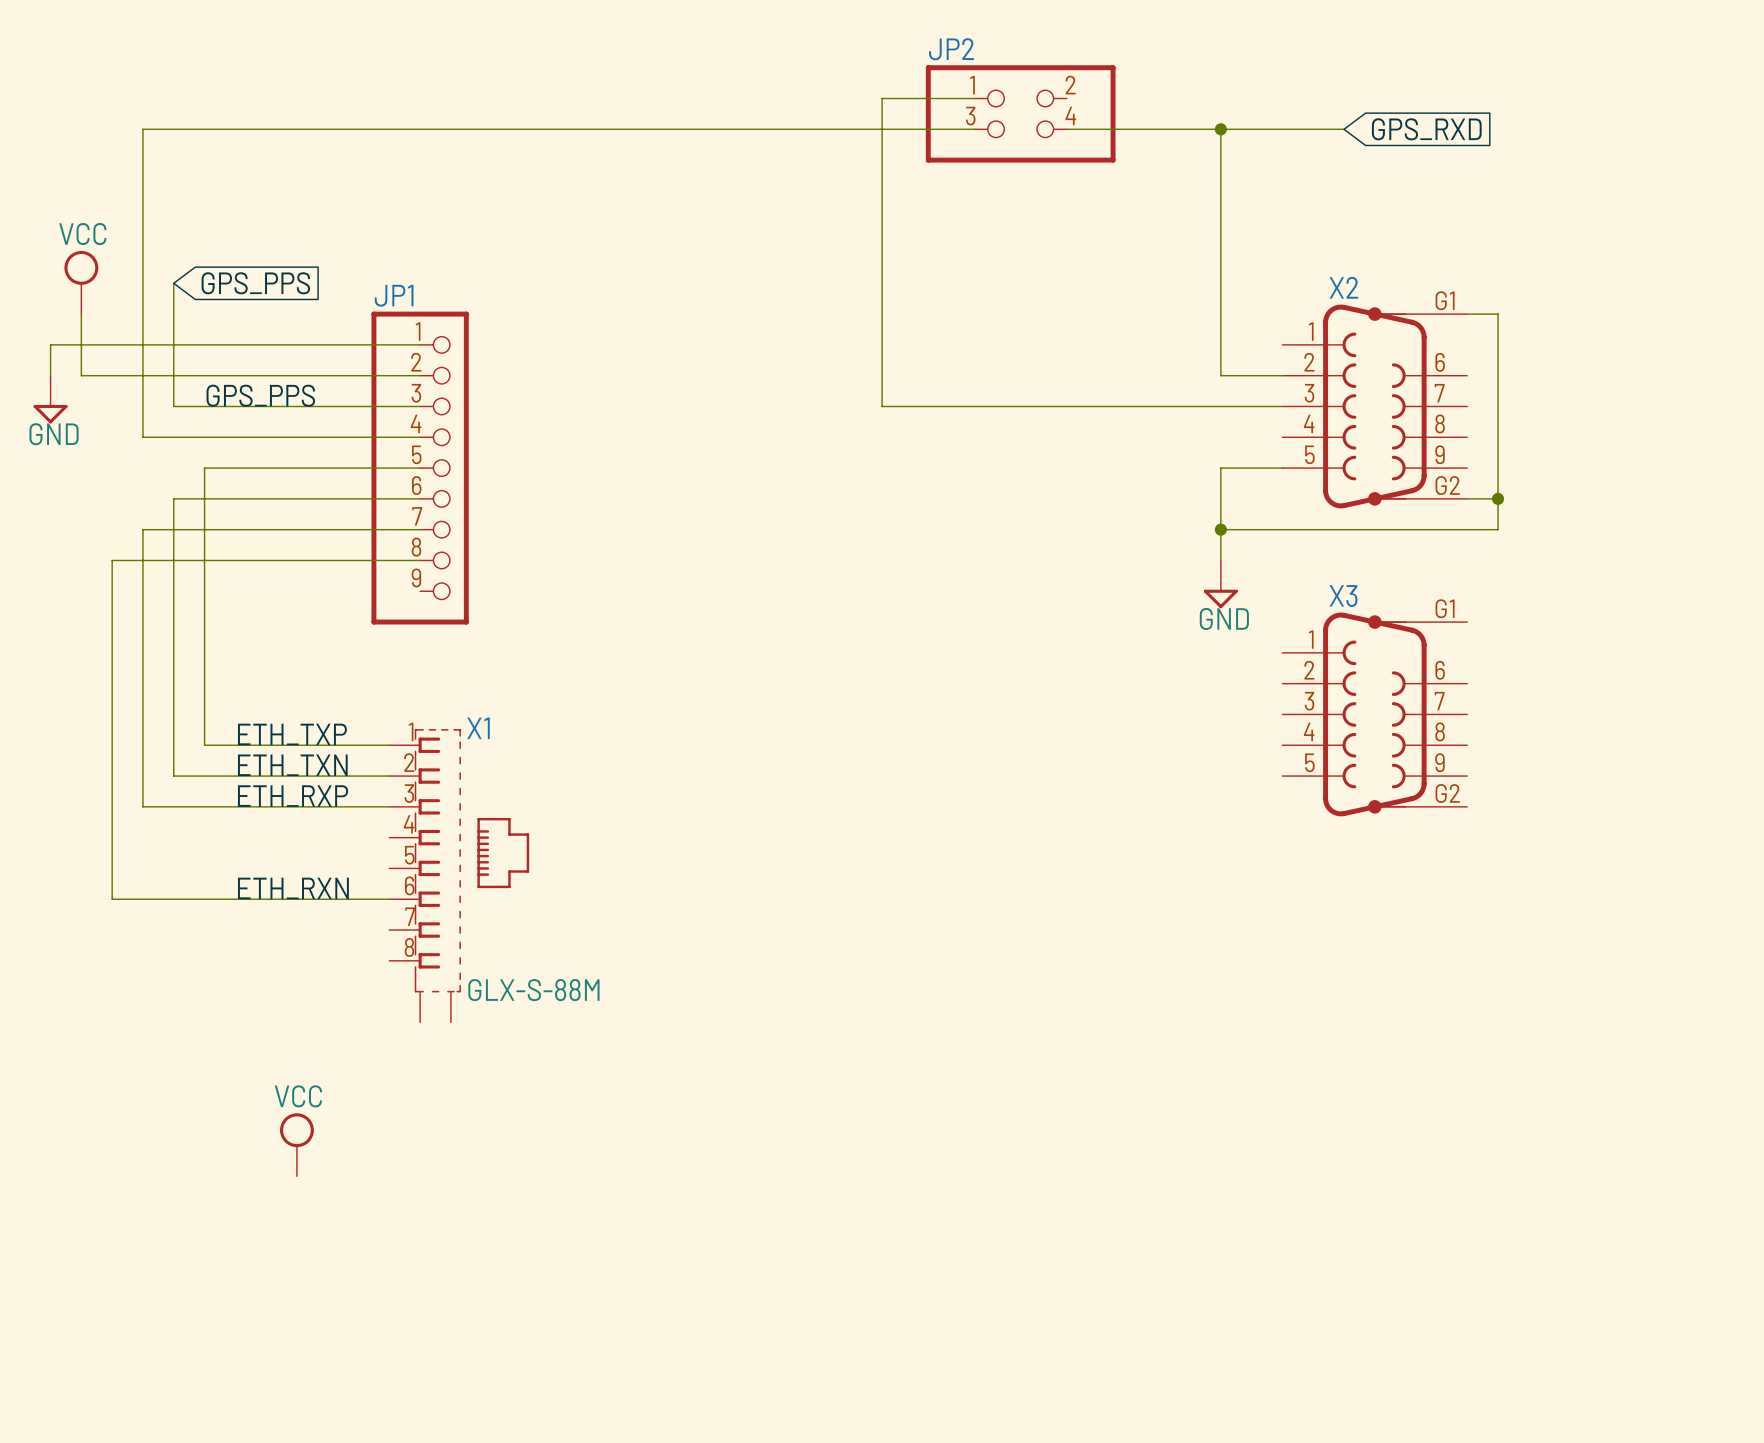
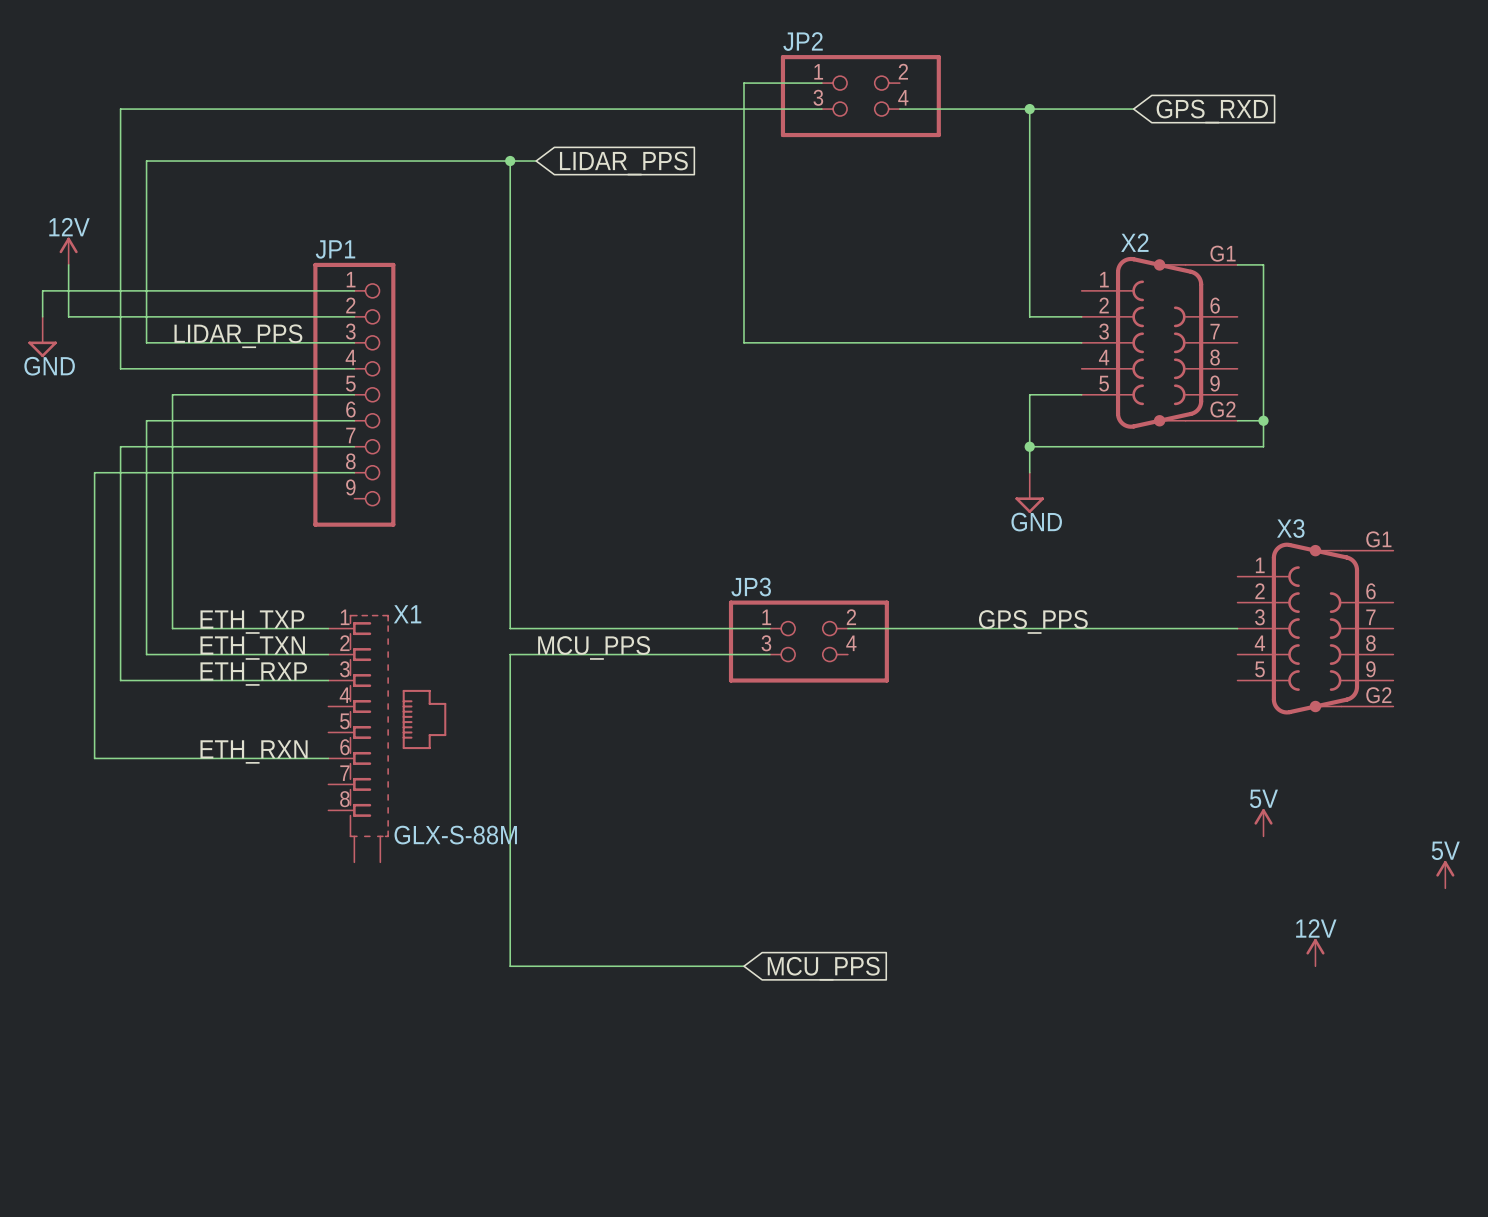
wire: none -> (510, 161) (510, 628) (769, 628)
junction: none -> (510, 161)
wire: none -> (536, 161) (146, 161) (146, 238)
global label: none -> LIDAR_PPS (623, 163)
power symbol: VCC (81, 282) -> none
global label: GPS_PPS (255, 283) -> none
power symbol: none -> 12V (68, 251)
label: GPS_PPS (260, 395) -> LIDAR_PPS (238, 336)
X3 position: (1374, 714) -> (1315, 628)
label: none -> GPS_PPS (1033, 621)
wire: none -> (847, 628) (1237, 628)
JP3: none -> (808, 641)
label: none -> MCU_PPS (594, 647)
wire: none -> (769, 654) (510, 654) (510, 966) (743, 966)
power symbol: none -> 5V (1263, 822)
power symbol: none -> 5V (1445, 874)
power symbol: none -> 12V (1315, 952)
power symbol: VCC (296, 1144) -> none
global label: none -> MCU_PPS (823, 968)

